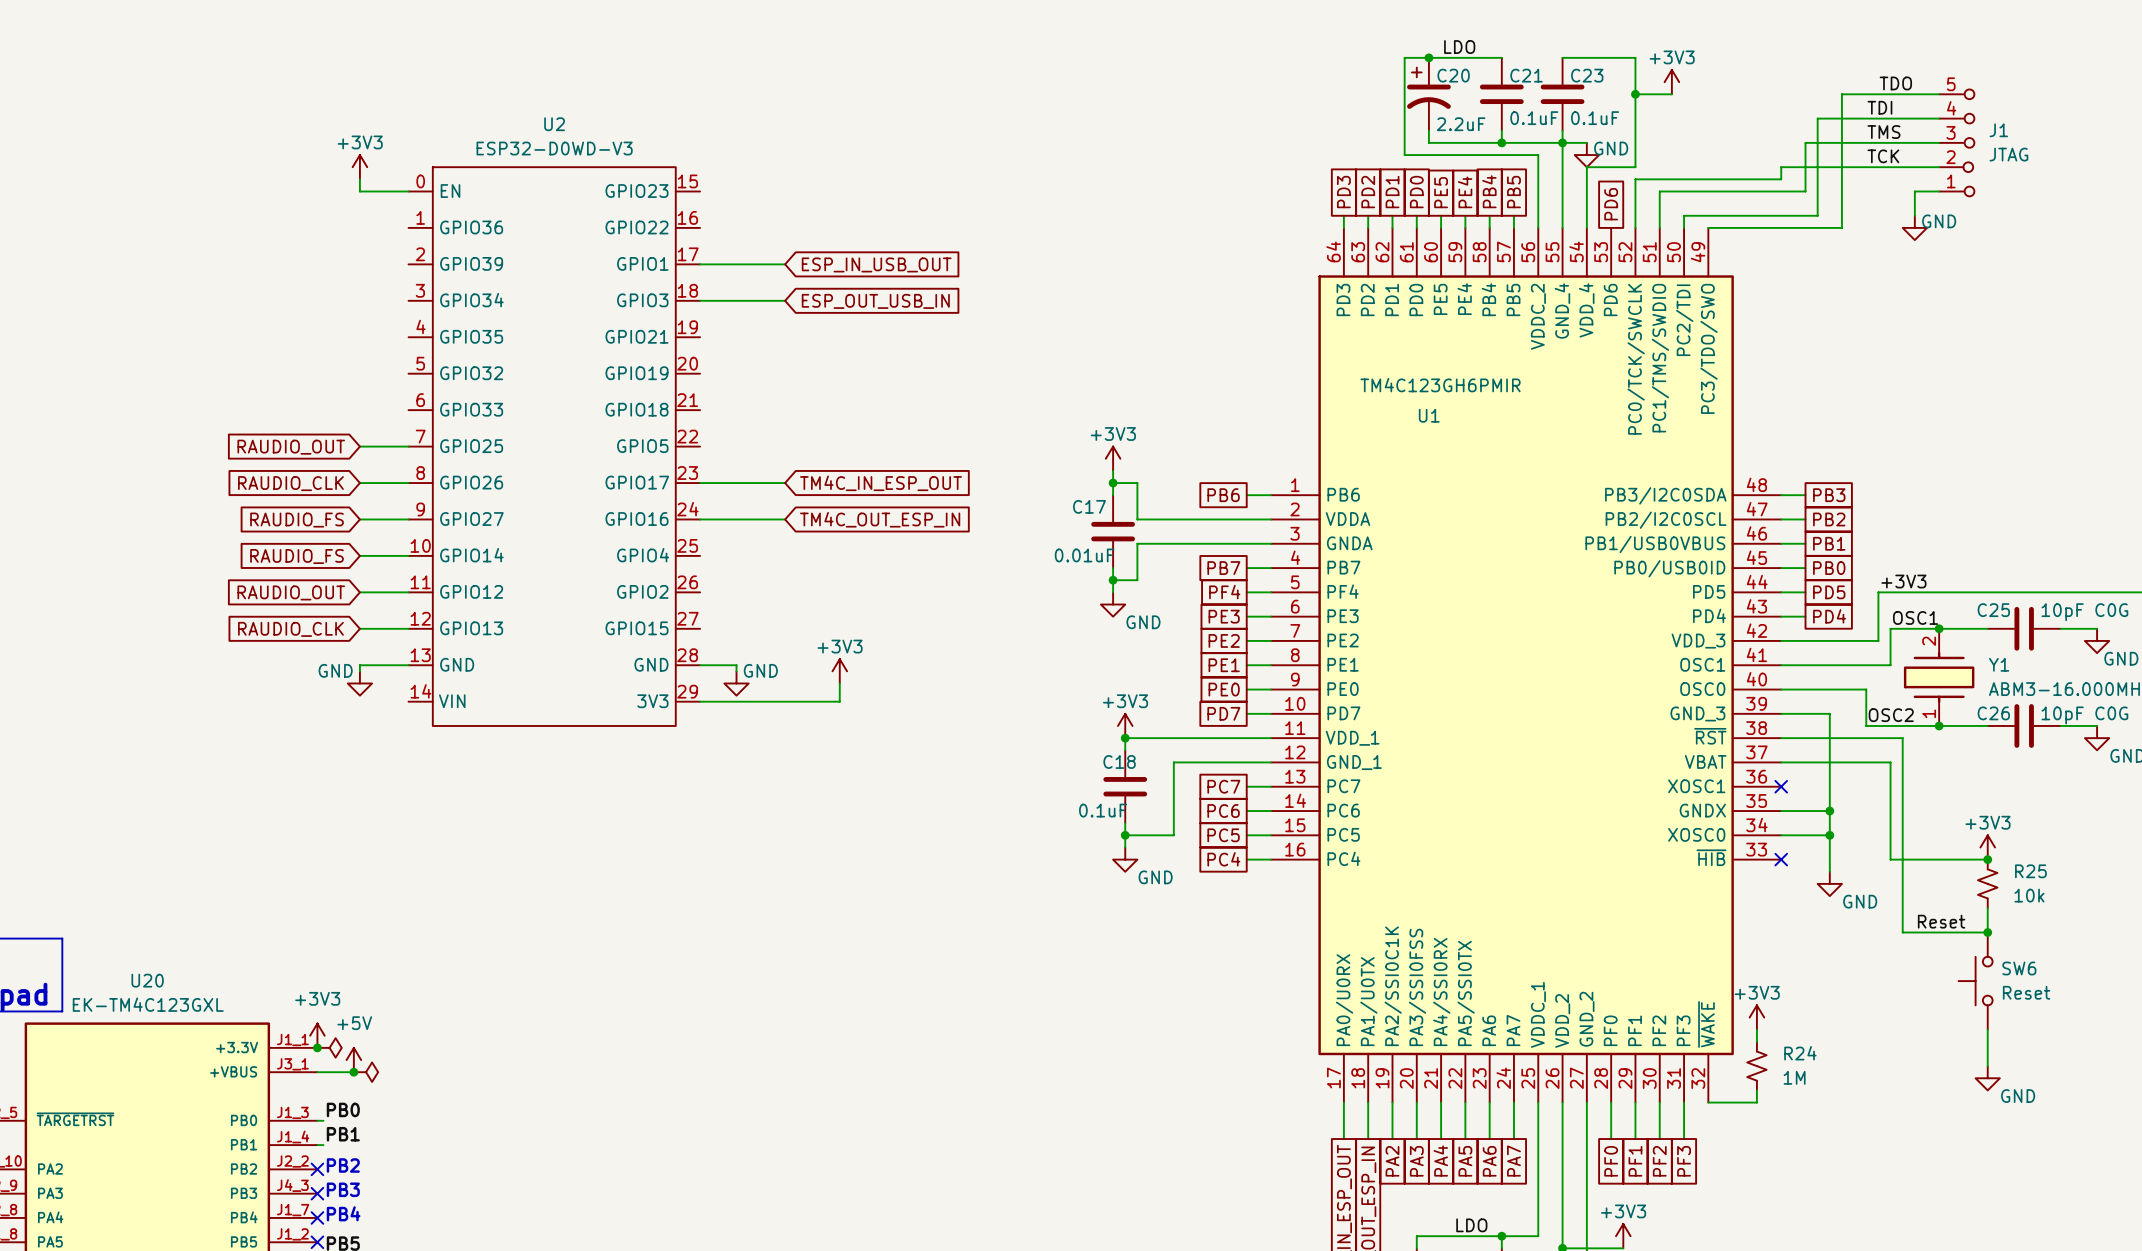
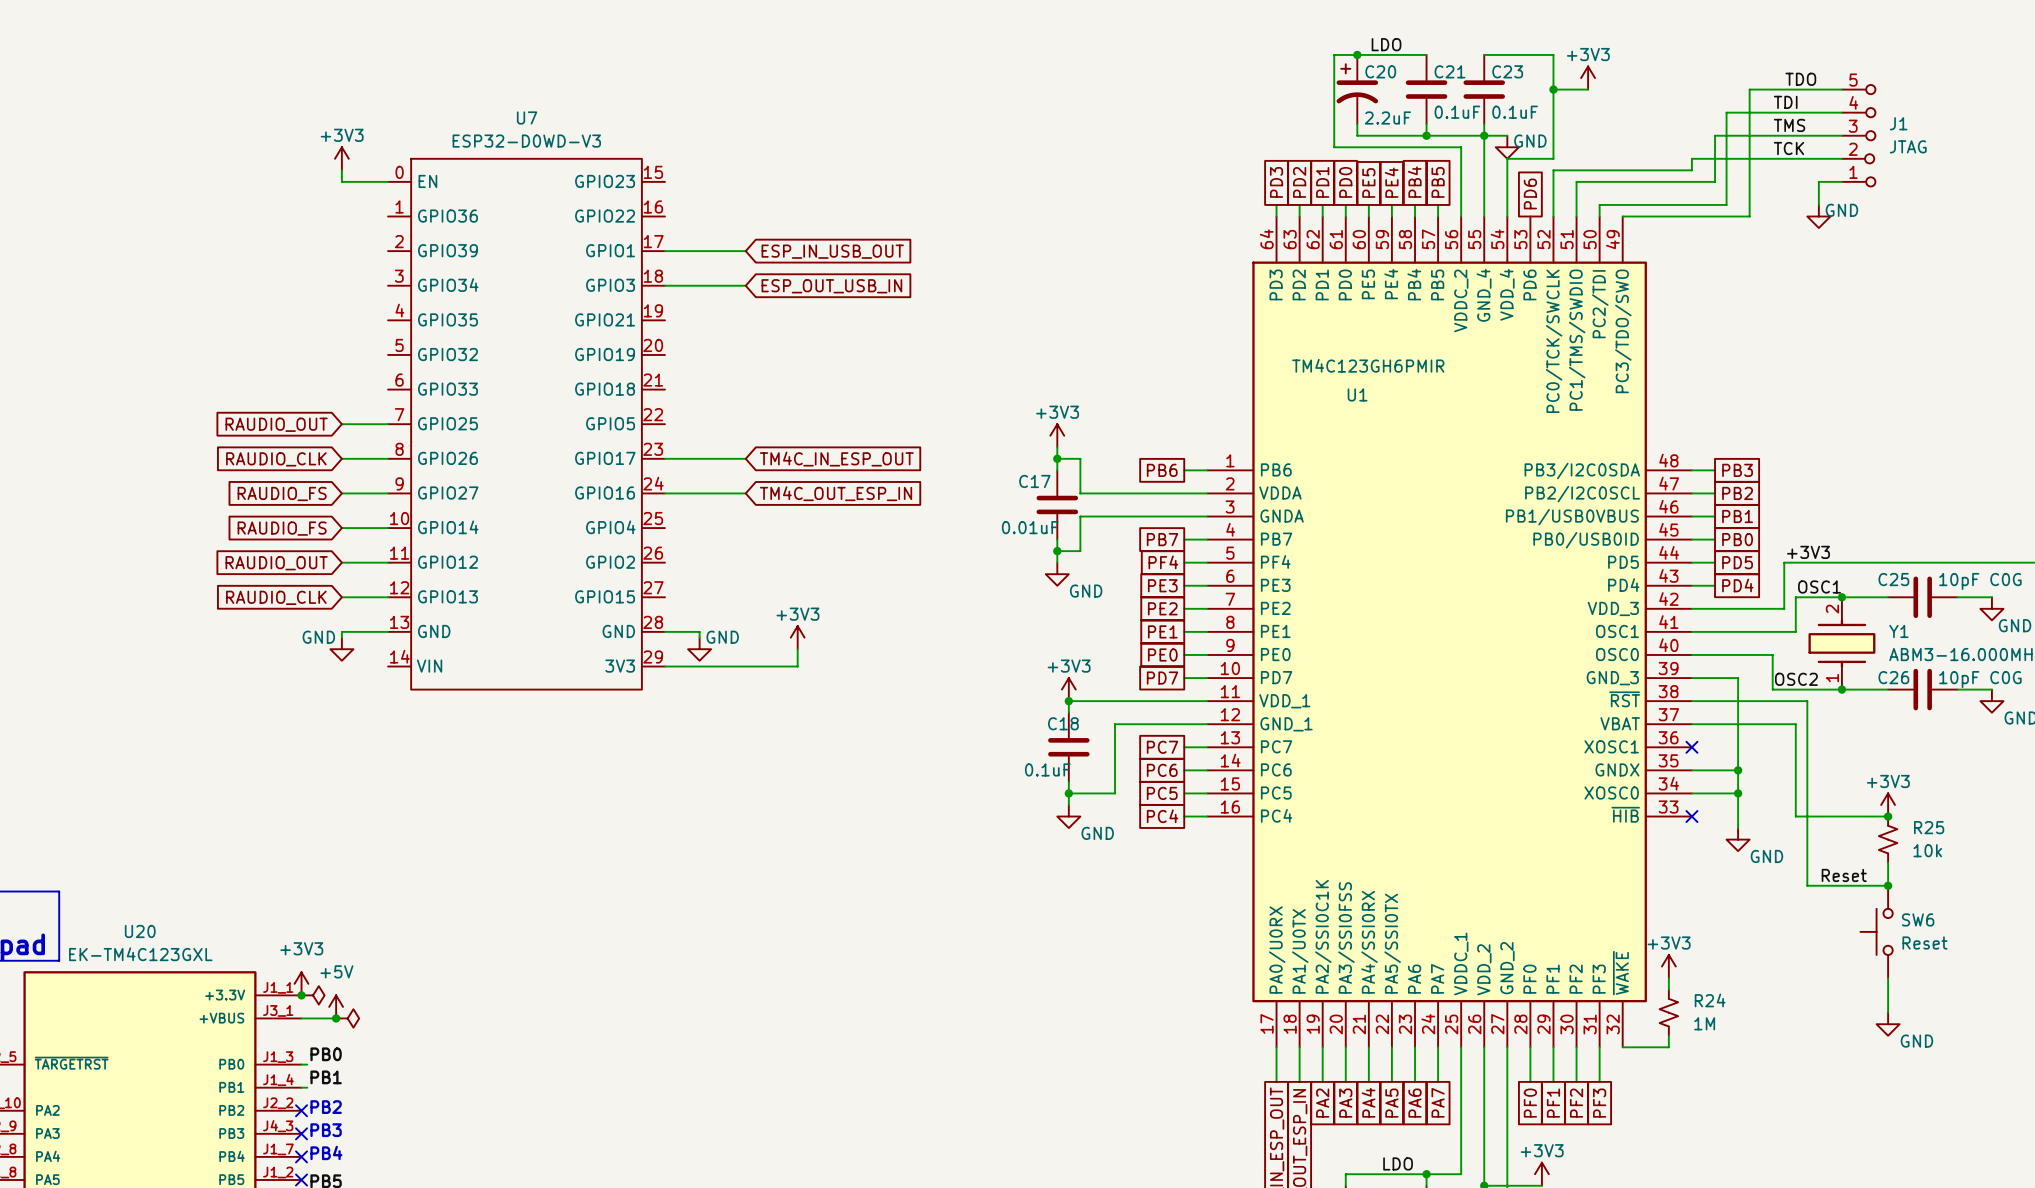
U2 name: U2 (554, 124) -> U7 (527, 117)

